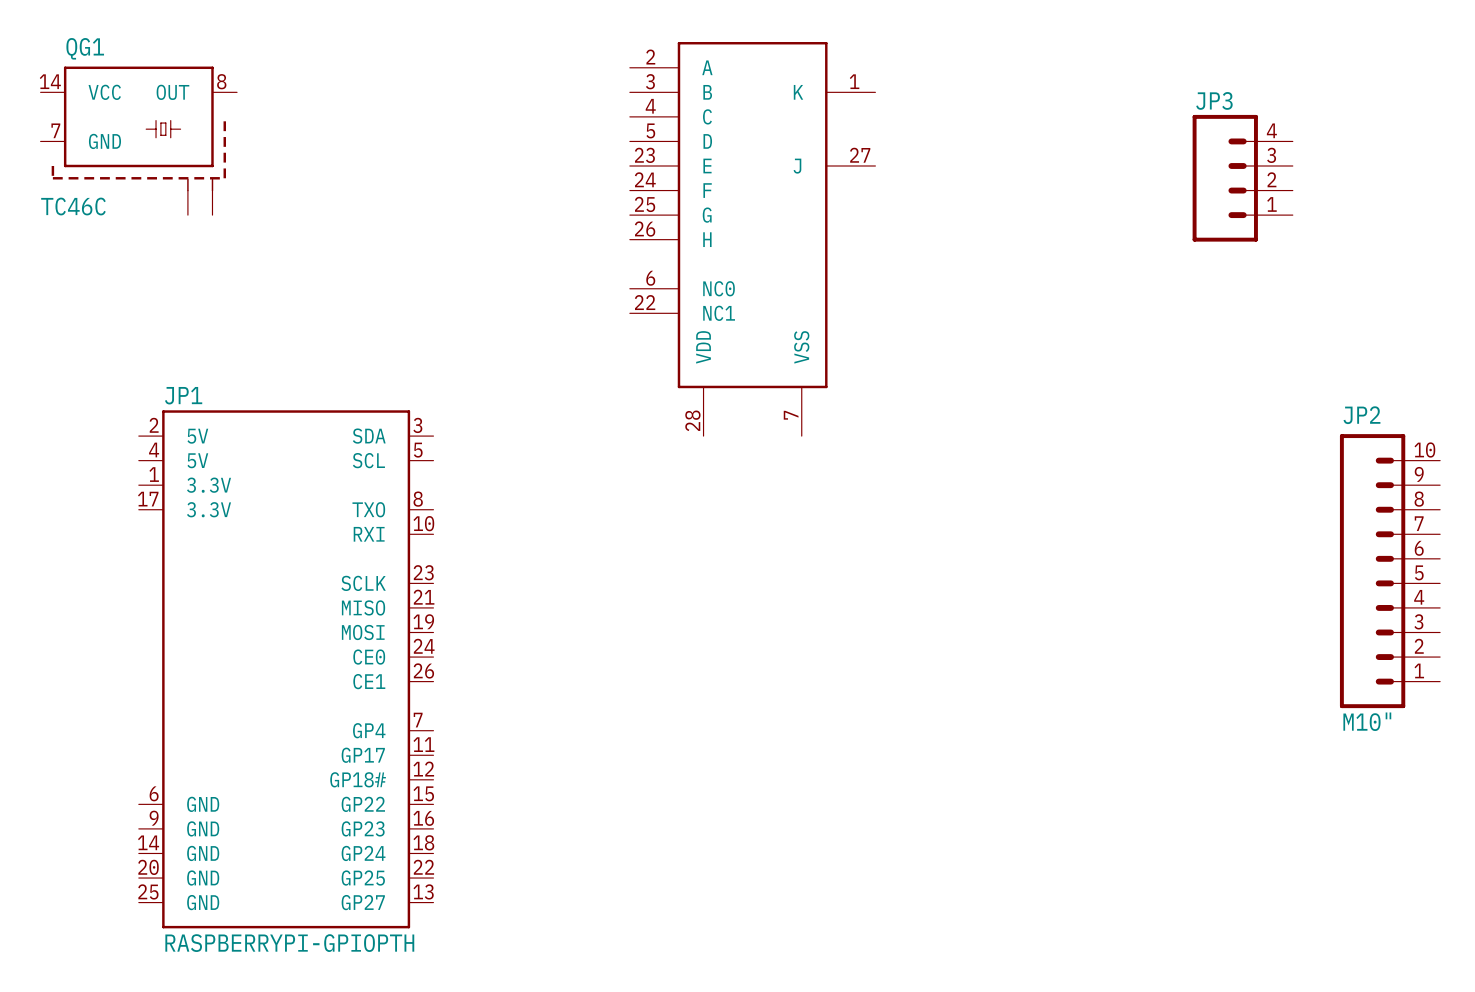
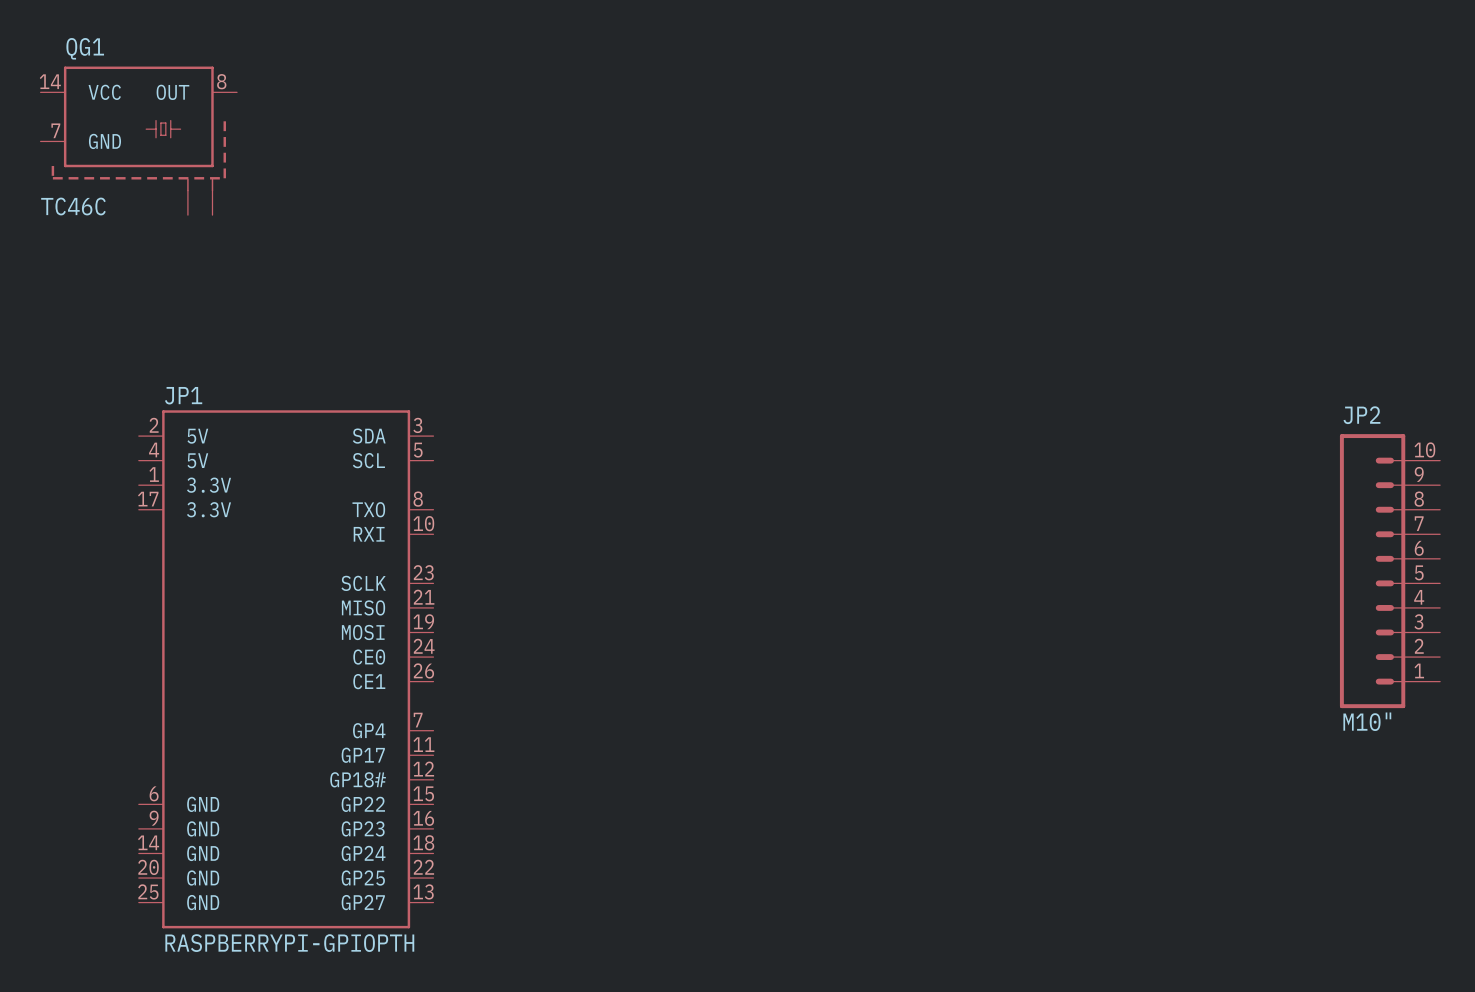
JP3: (1242, 178) -> none
part: (752, 239) -> none

